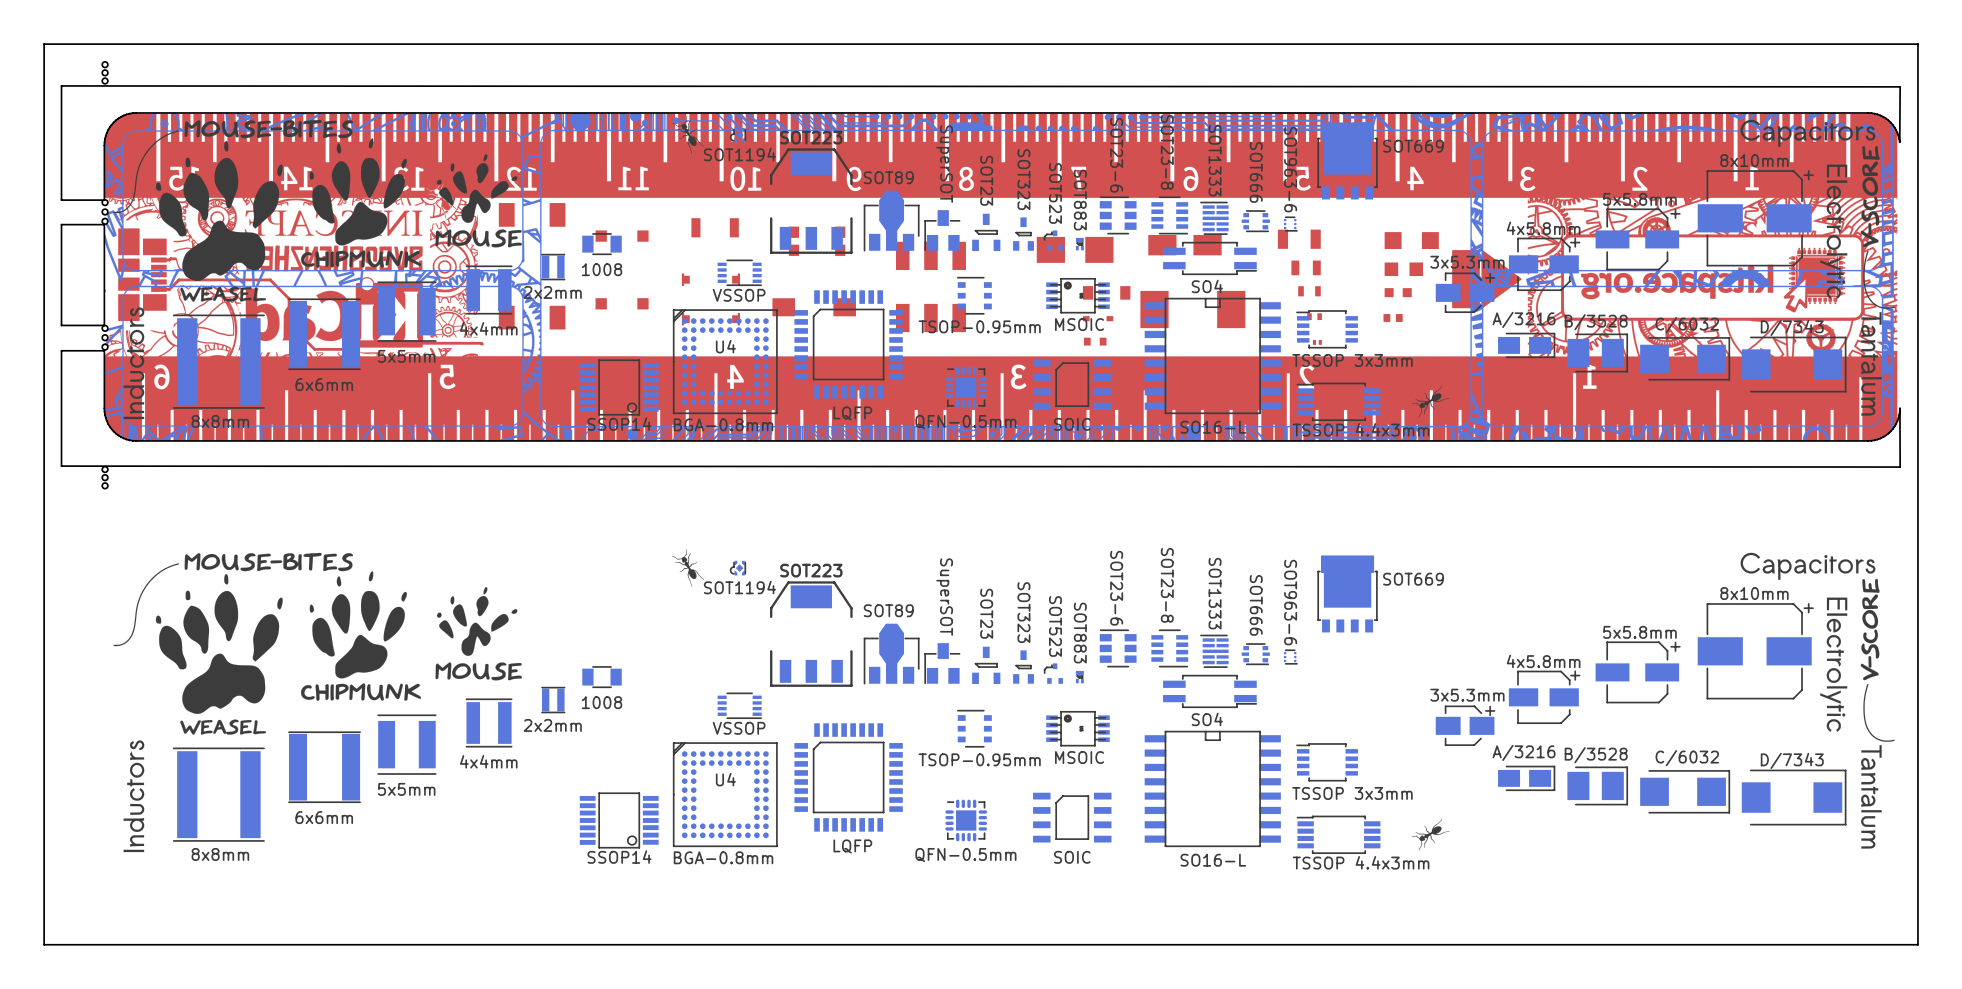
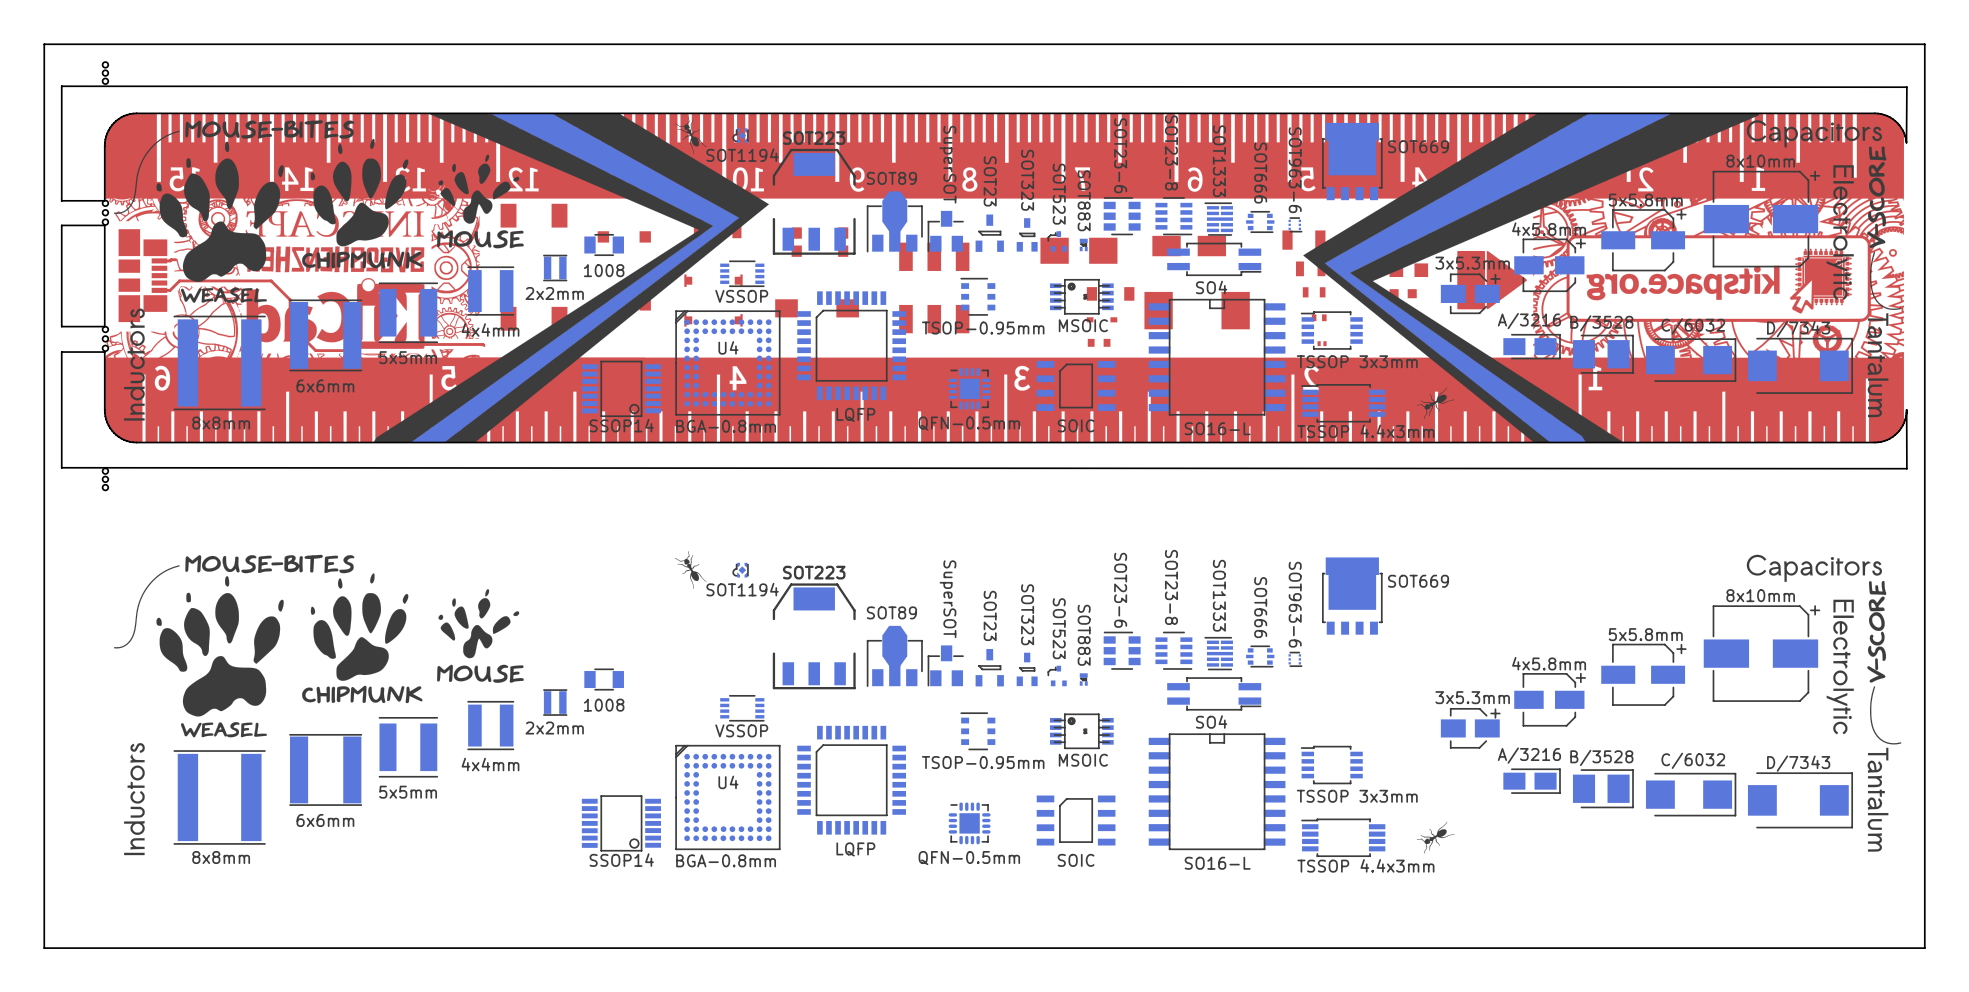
part footprint: [60, 61, 1901, 489] -> [61, 62, 1908, 491]

